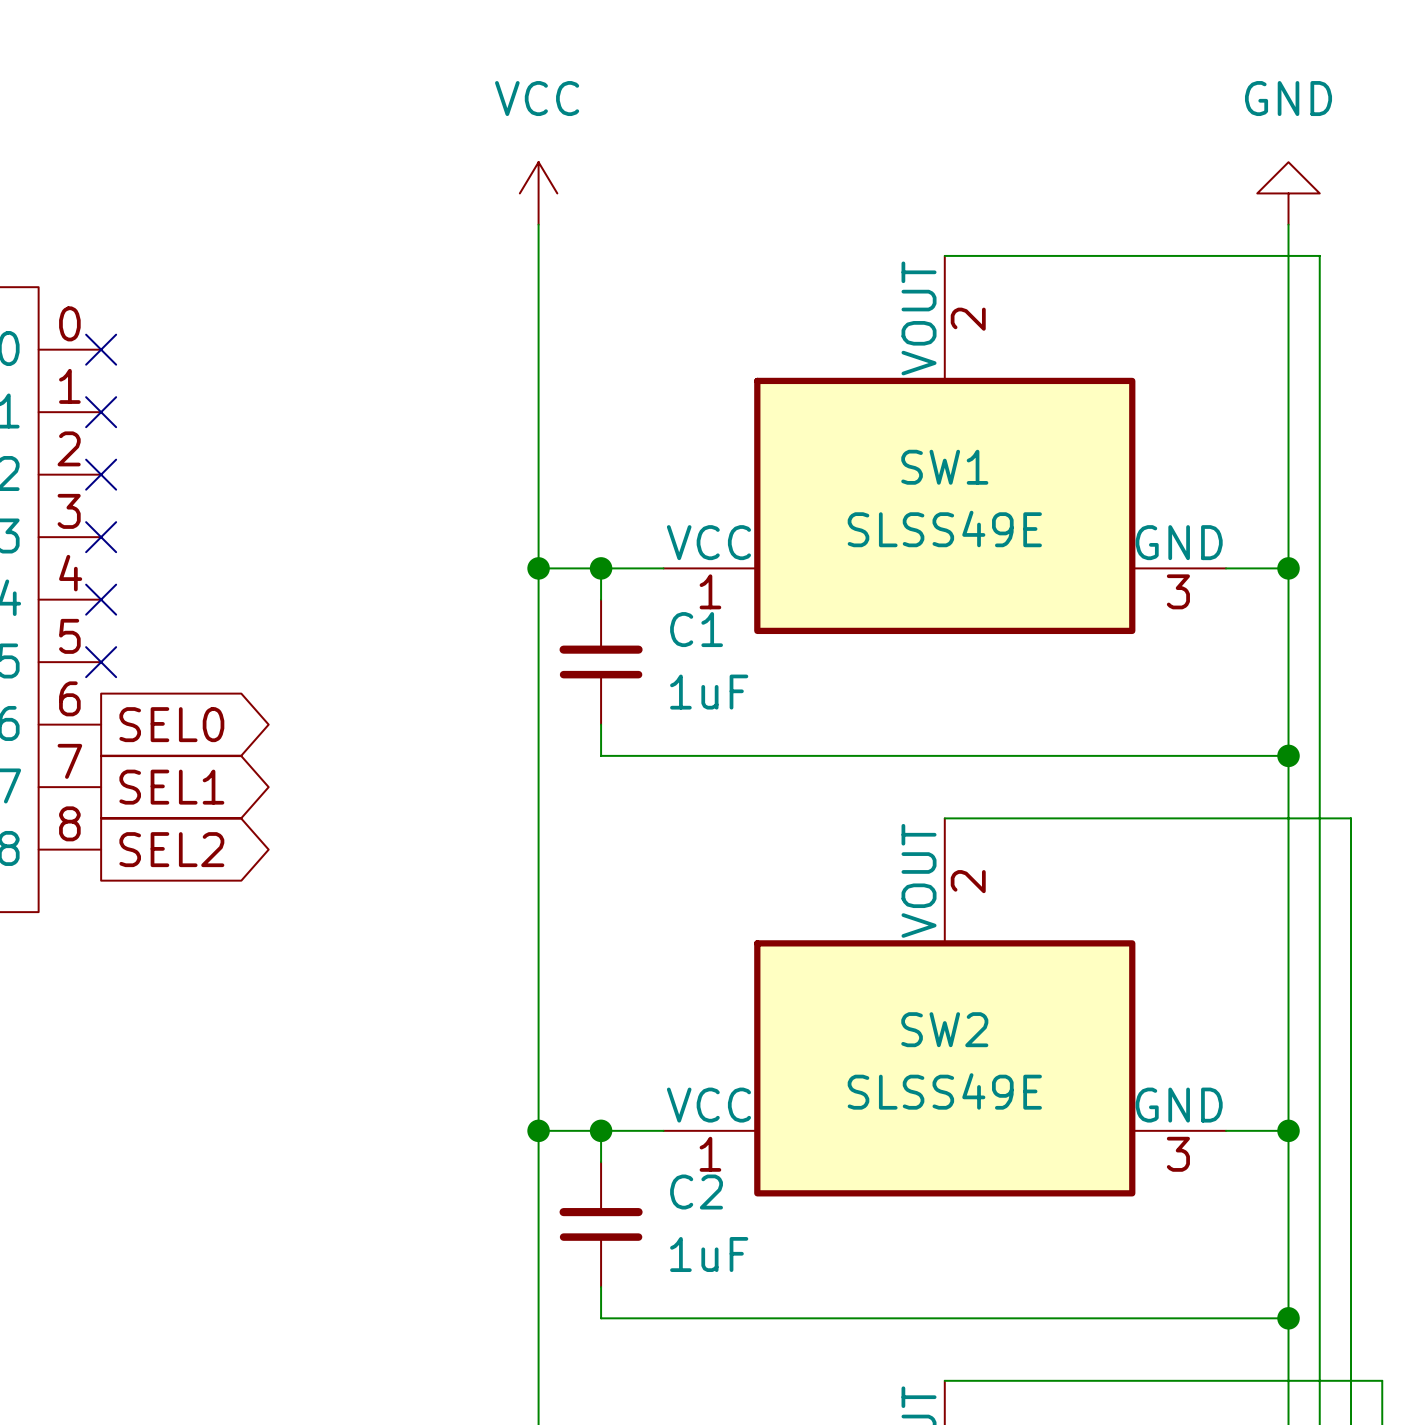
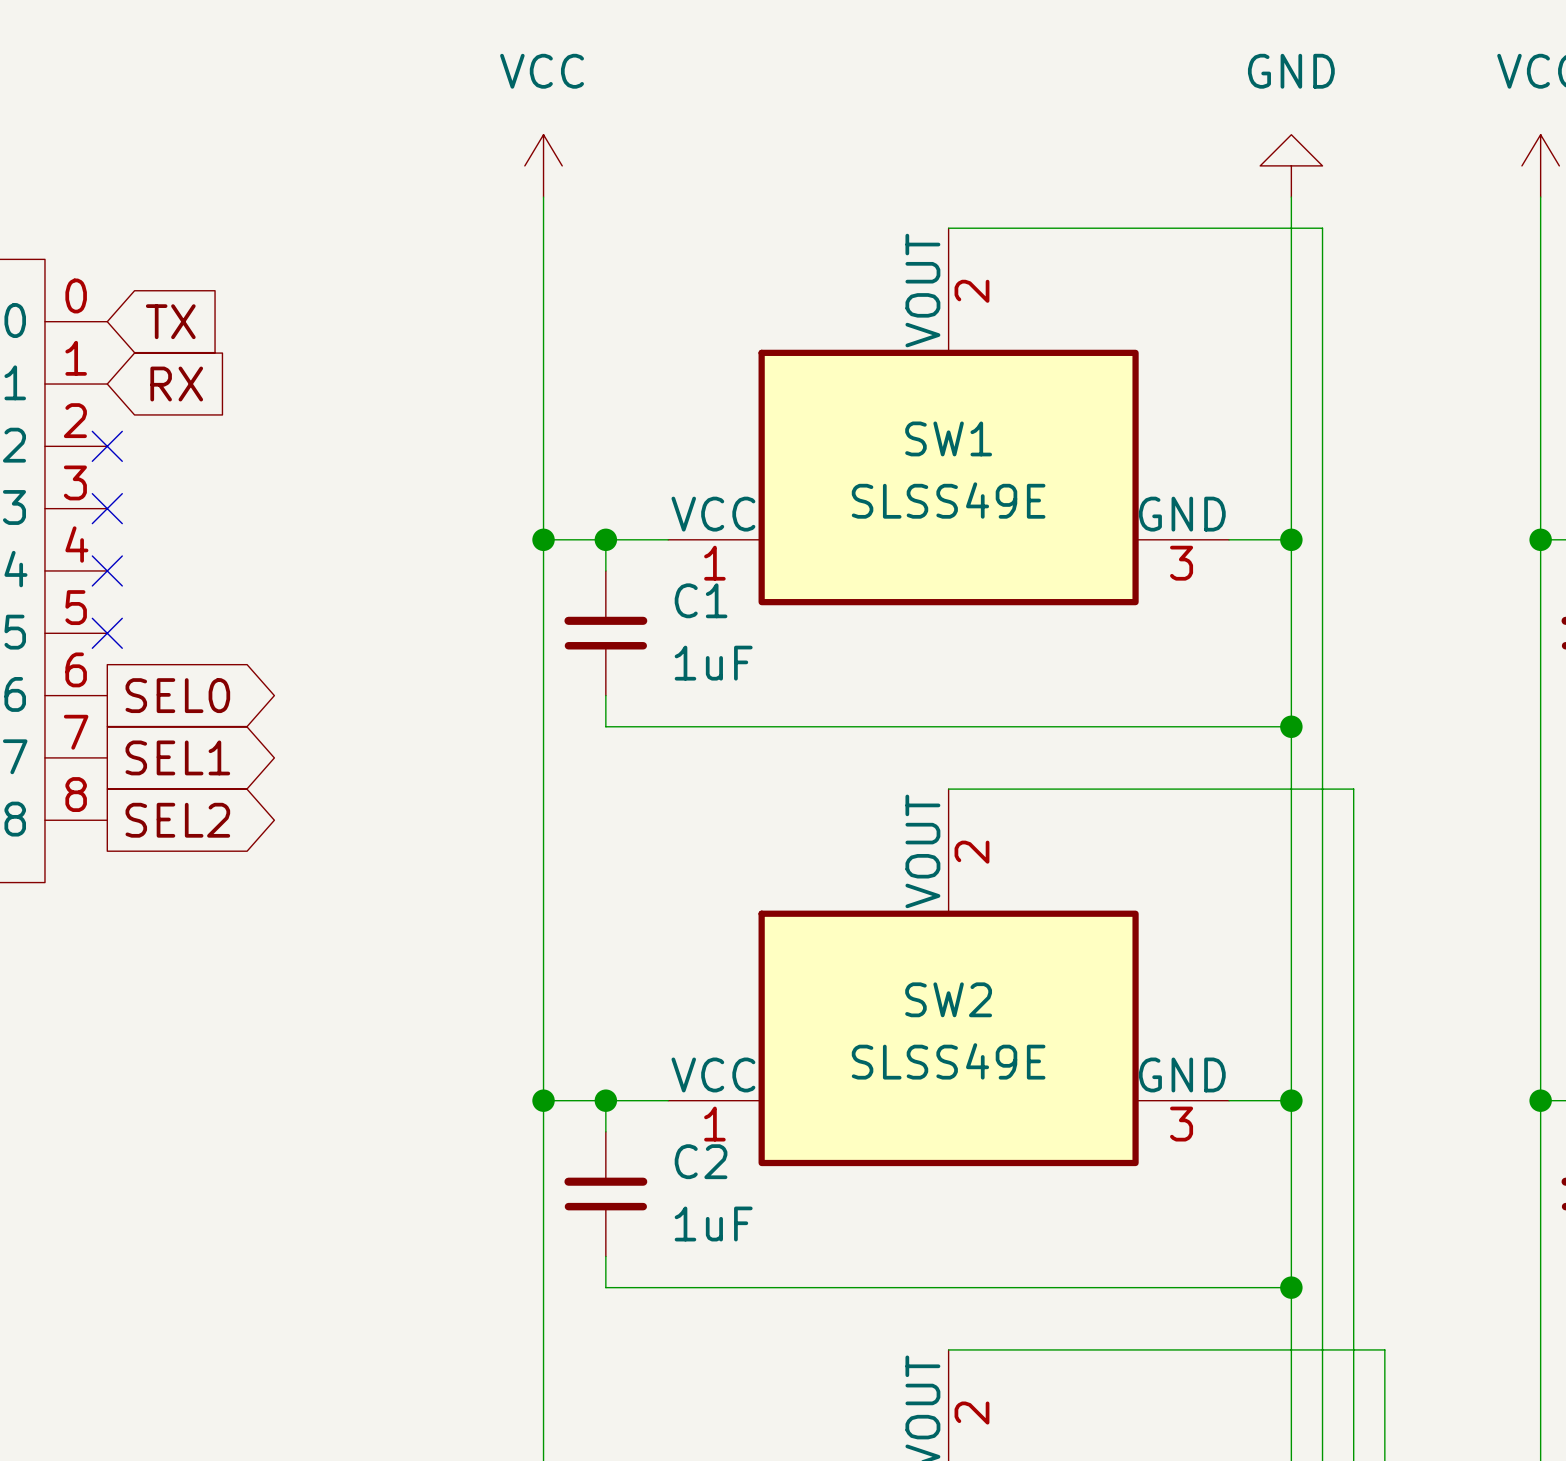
no-connect mark: (101, 349) -> none
global label: none -> TX (170, 321)
no-connect mark: (101, 412) -> none
global label: none -> RX (176, 384)

